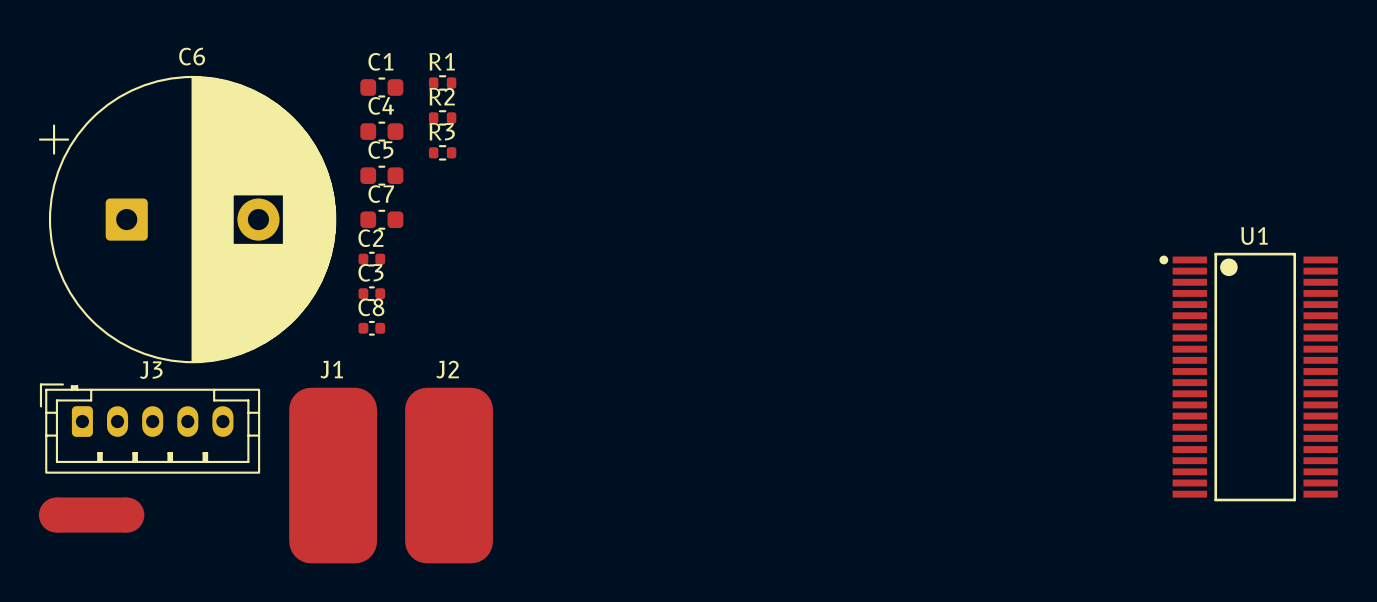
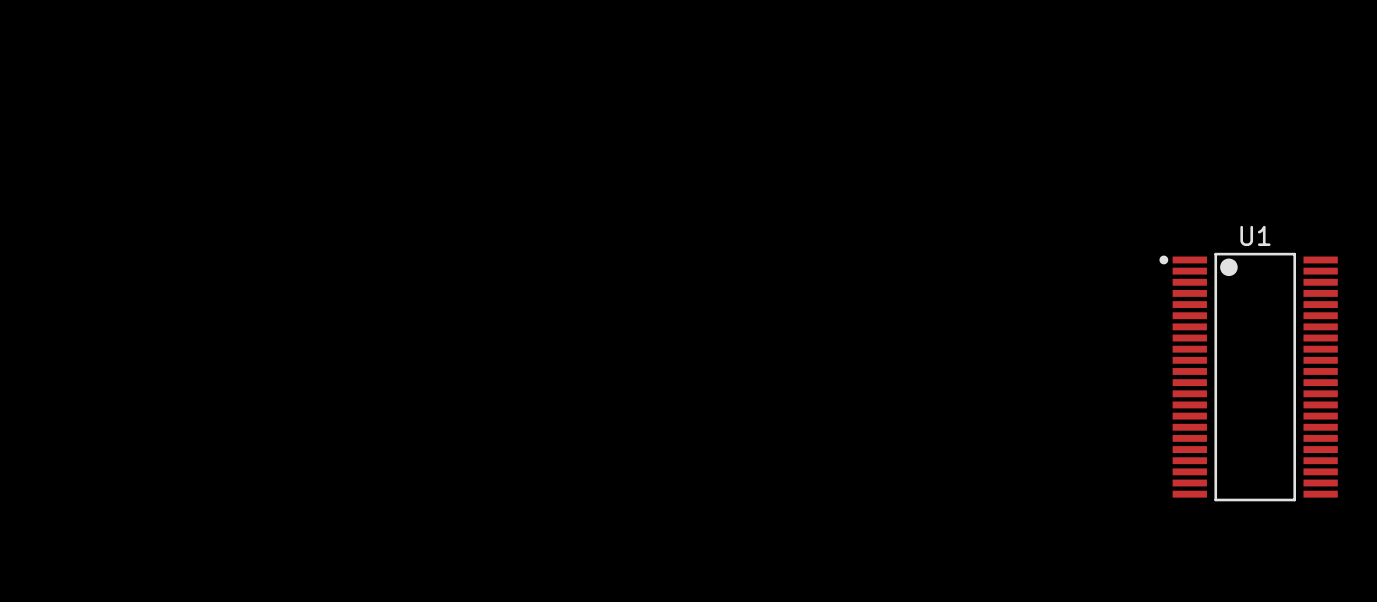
R1: (442, 82) -> none
C1: (381, 87) -> none
R2: (442, 117) -> none
C4: (381, 131) -> none
R3: (442, 152) -> none
C5: (381, 175) -> none
C6: (187, 219) -> none
C7: (381, 219) -> none
C2: (371, 259) -> none
C3: (371, 293) -> none
C8: (371, 328) -> none
J3: (150, 428) -> none
J1: (333, 475) -> none
J2: (449, 475) -> none
part: (91, 515) -> none

